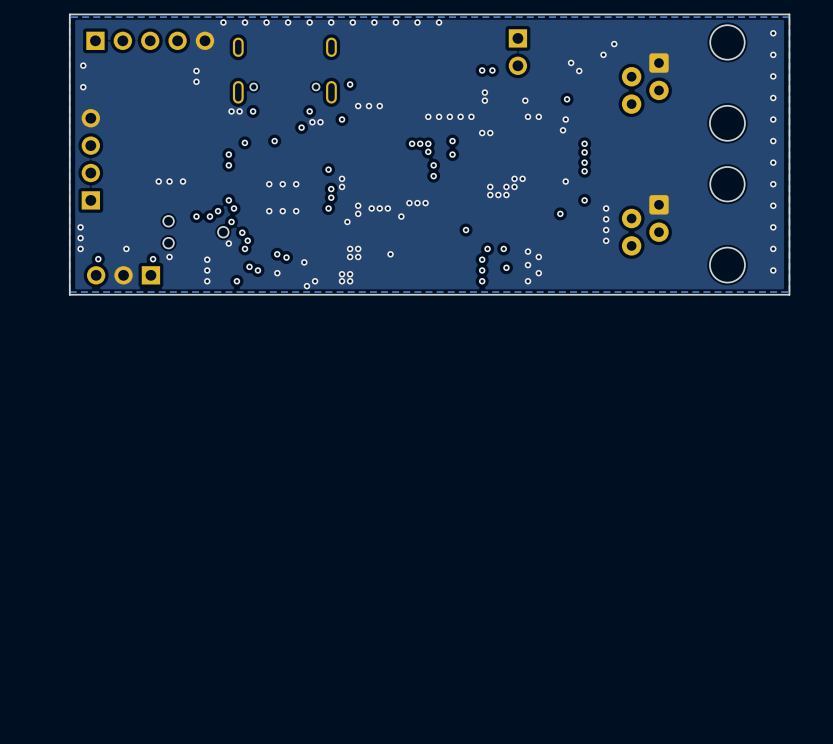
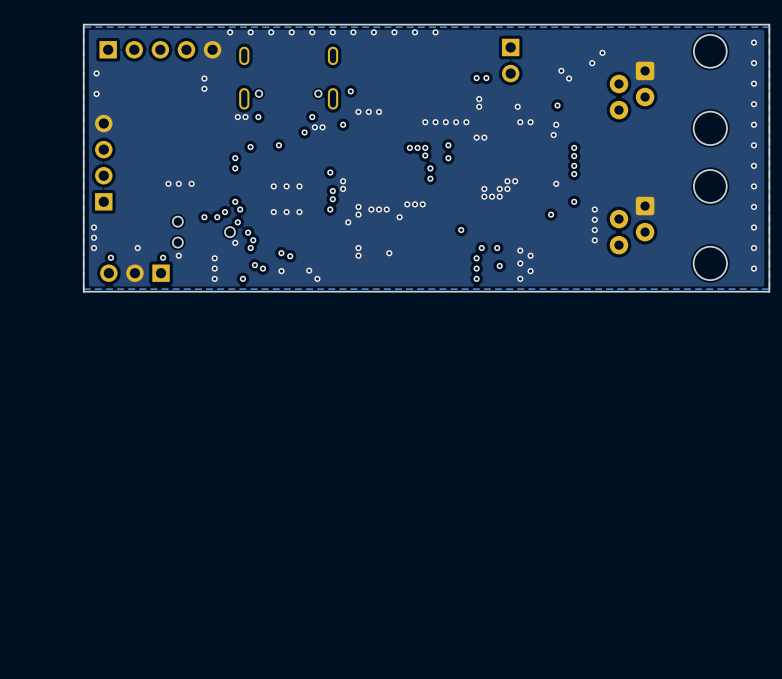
via: (350, 248) -> none
via: (350, 257) -> none
via: (304, 262) -> none
via: none -> (309, 270)
via: (342, 274) -> none
via: (350, 274) -> none
via: (342, 281) -> none
via: (350, 281) -> none
via: (306, 286) -> none

